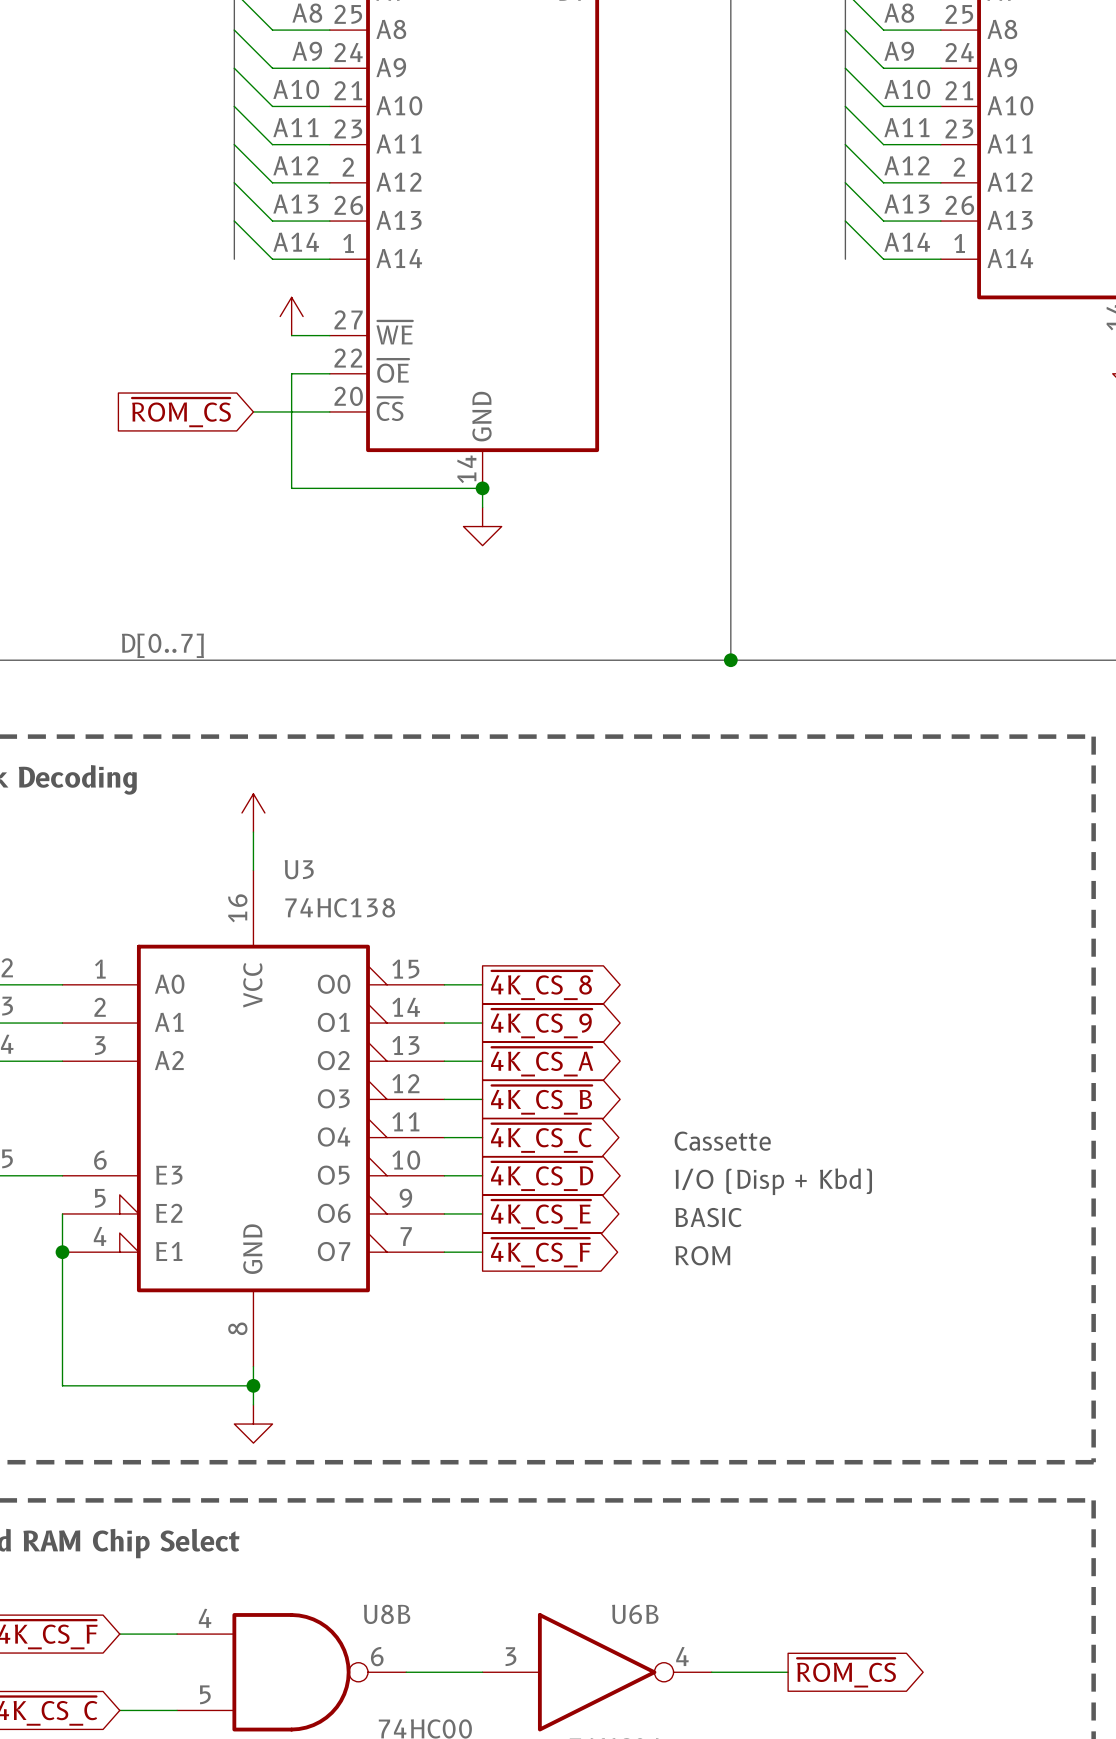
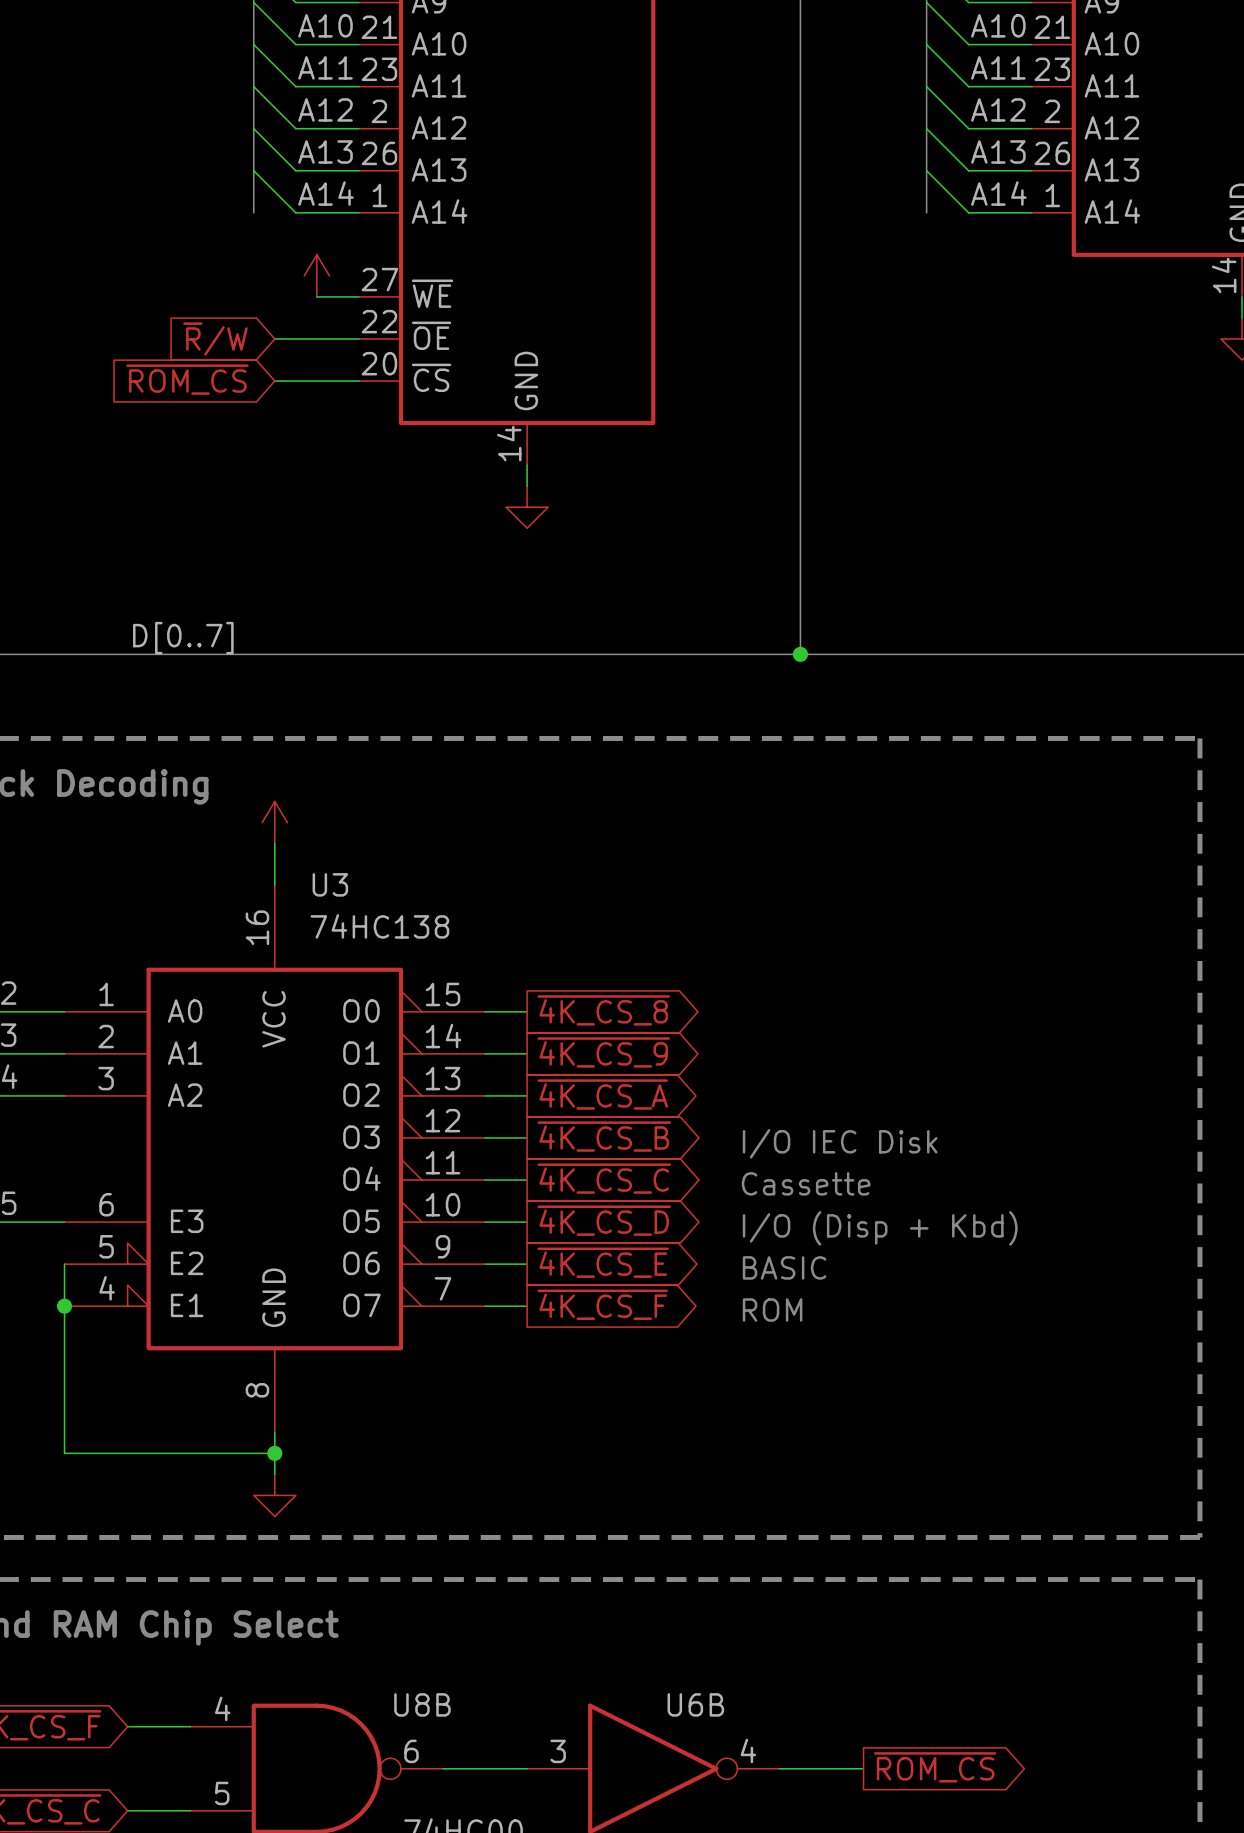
global label: none -> ~{R}/W (215, 339)
wire: (291, 373) (291, 488) (482, 488) -> (316, 338) (274, 338)
junction: (482, 488) -> none
text: none -> I/O IEC Disk (840, 1143)

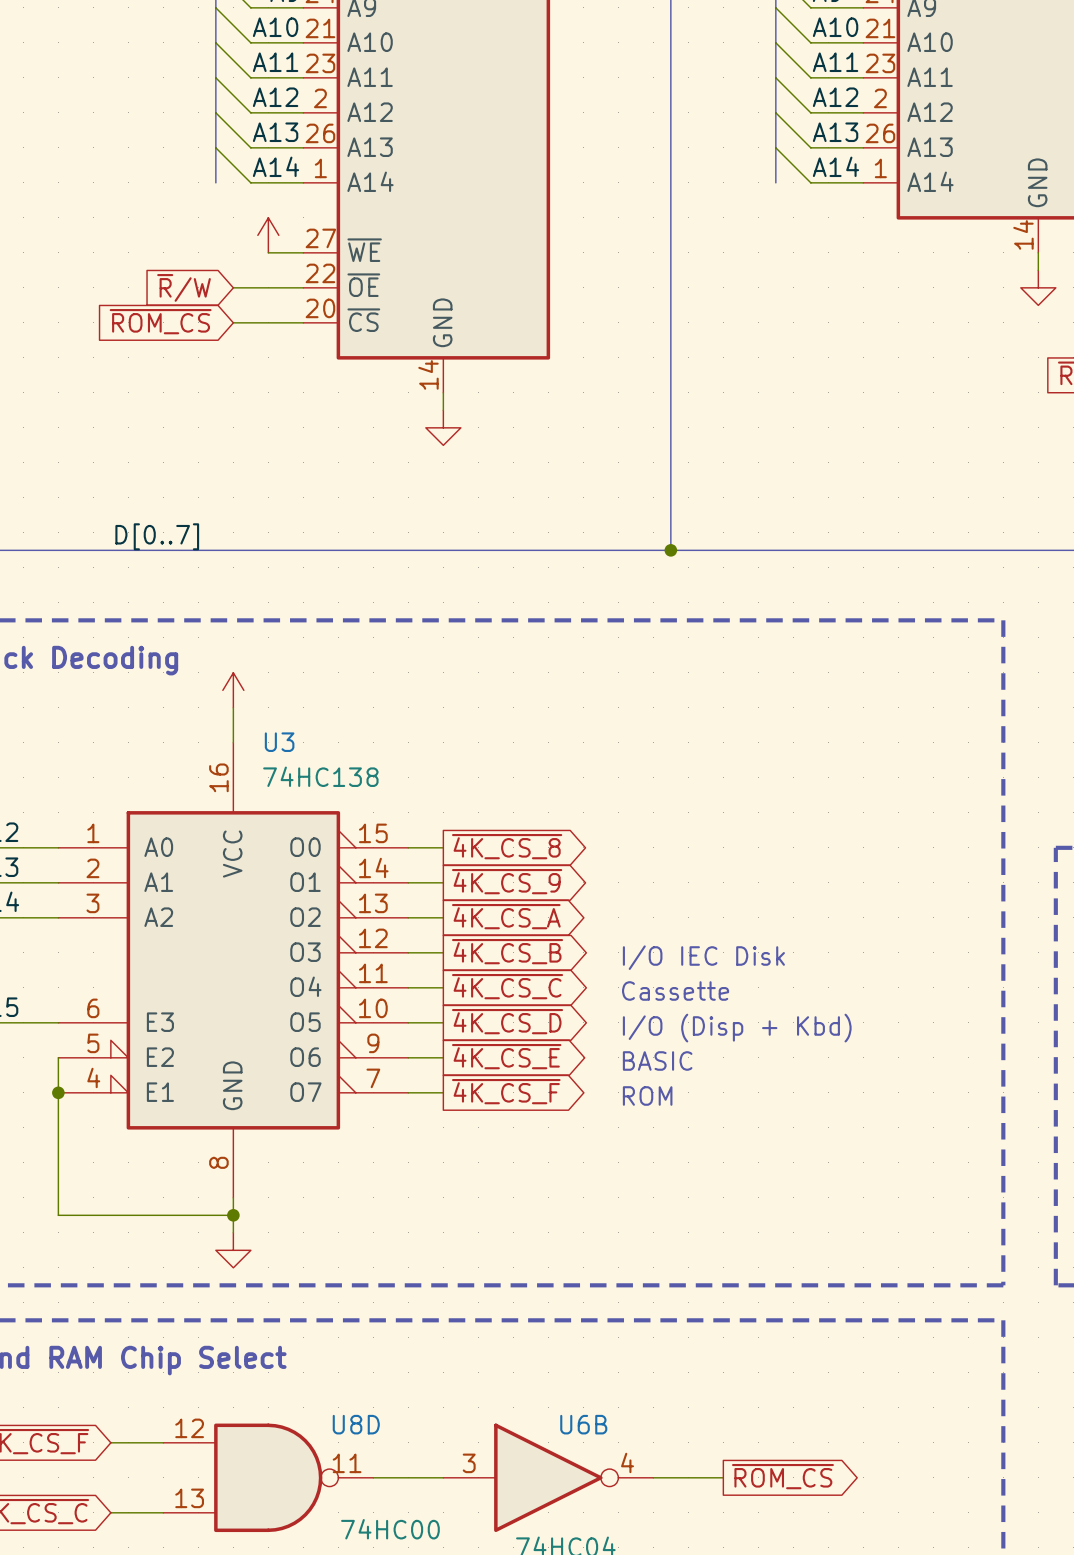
U8B name: U8B (422, 1704) -> U8D (356, 1424)
U8B pin number: 4 (222, 1708) -> 12 (189, 1428)
U8B pin number: 6 (411, 1751) -> 11 (347, 1463)
U8B pin number: 5 (222, 1793) -> 13 (189, 1498)

